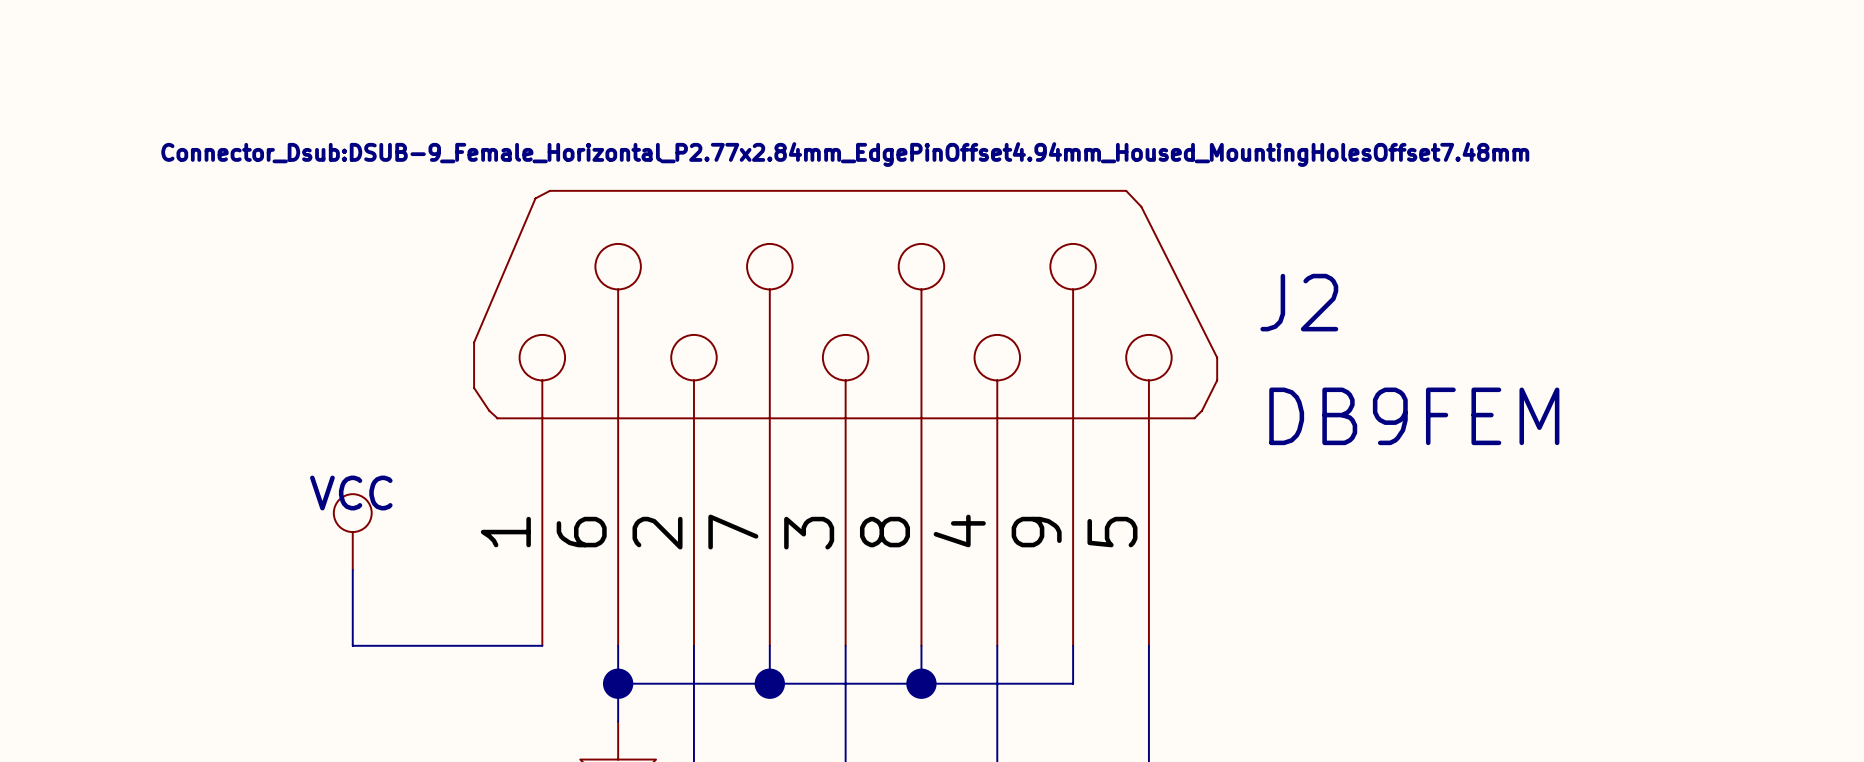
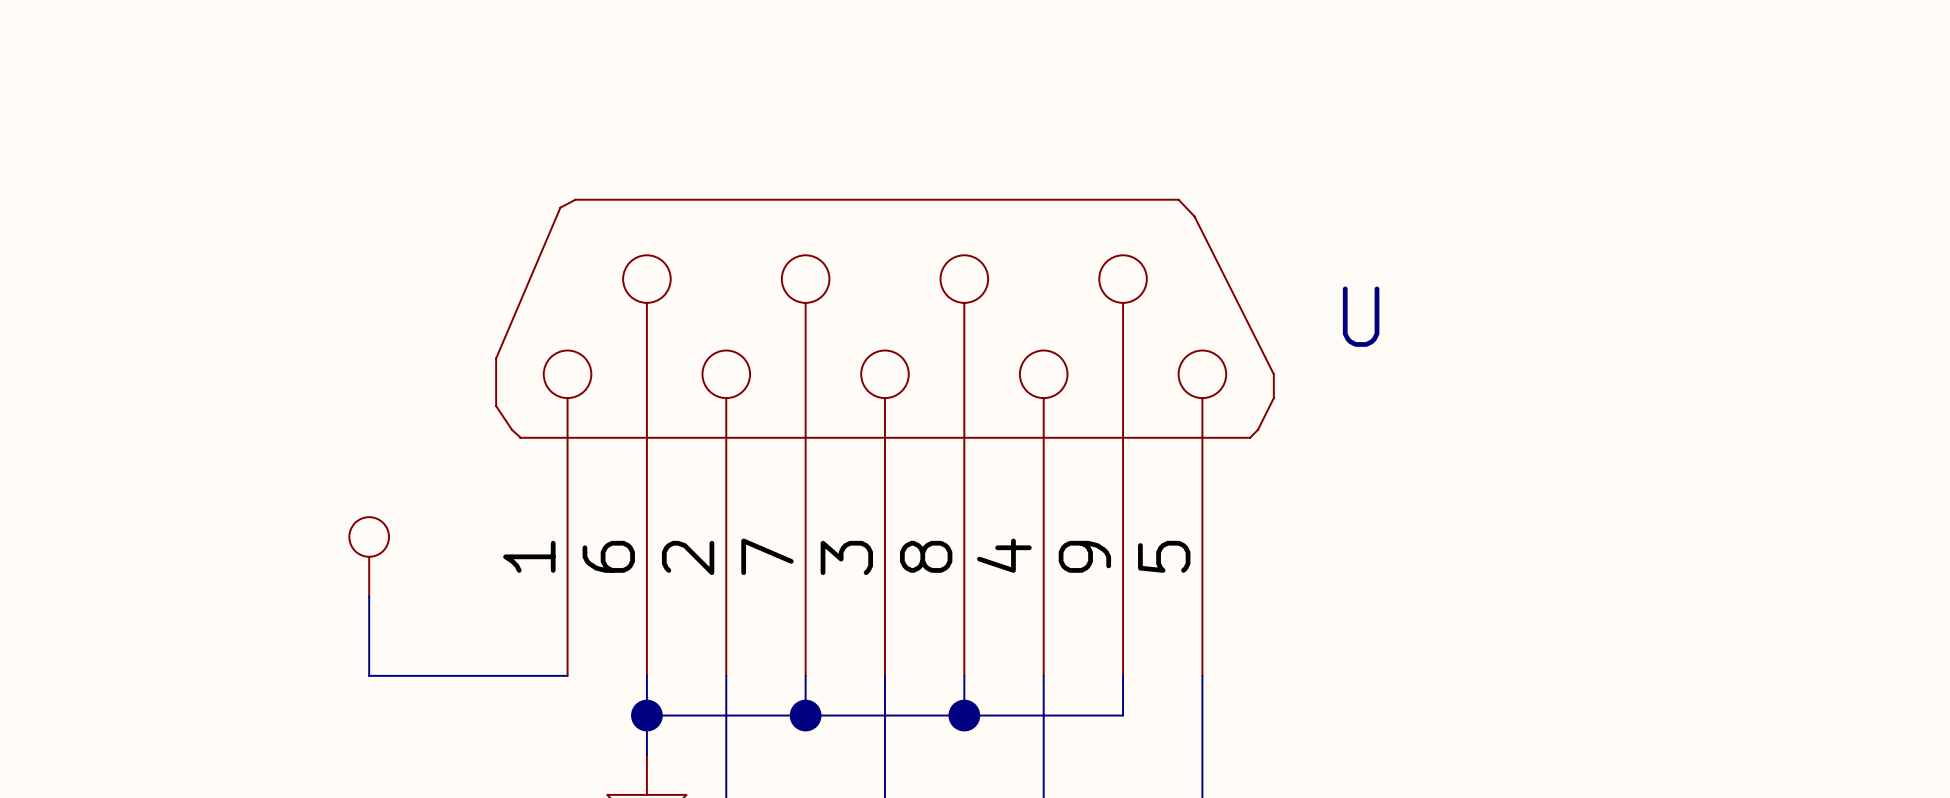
J2 text: Connector_Dsub:DSUB-9_Female_Horizontal_P2.77x2.84mm_EdgePinOffset4.94mm_Housed_MountingHolesOffset7.48mm (845, 154) -> none
J2 name: J2 (1299, 302) -> U (1361, 316)
J2 value: DB9FEM (1414, 416) -> none
power symbol text: VCC (351, 493) -> none

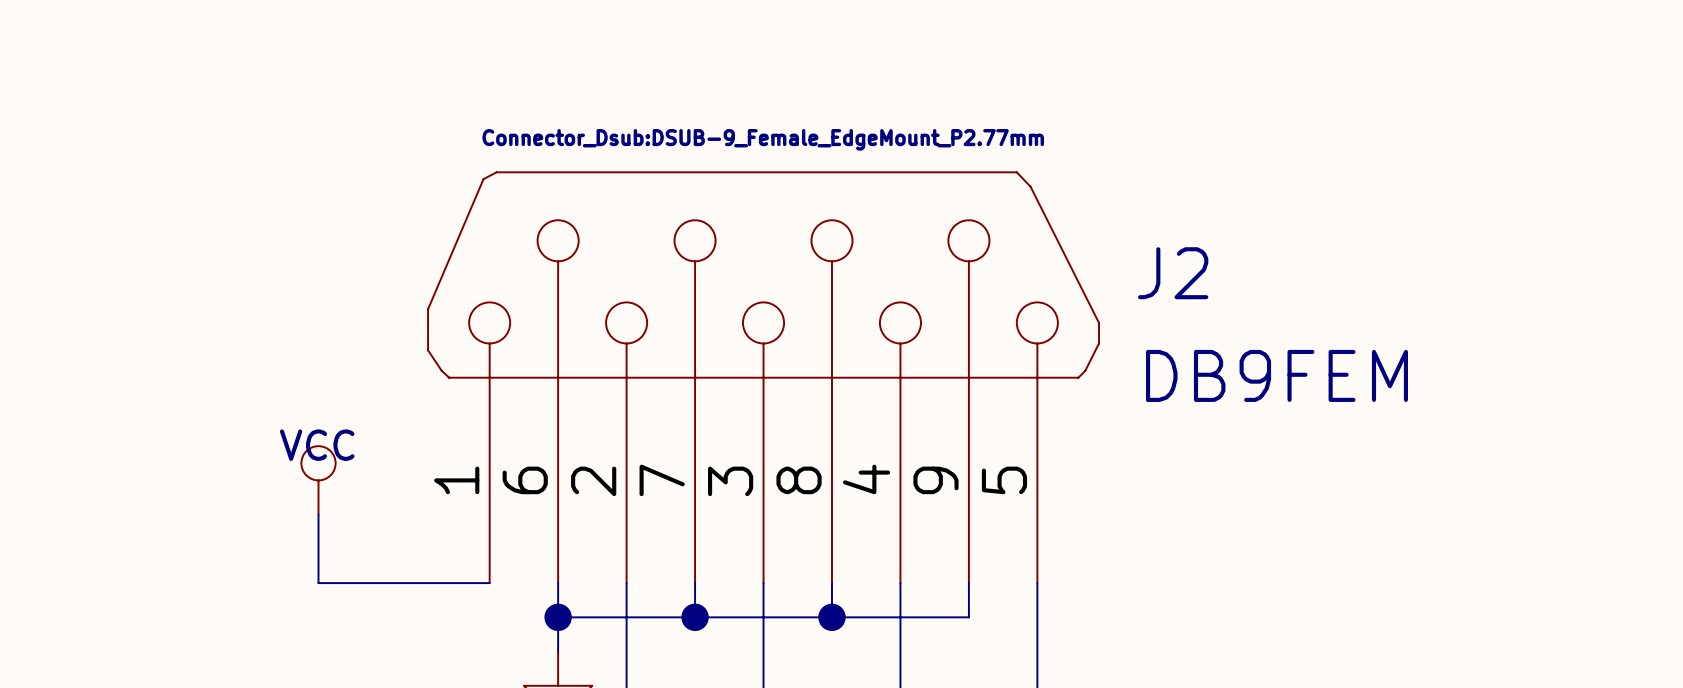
U text: none -> Connector_Dsub:DSUB-9_Female_EdgeMount_P2.77mm (763, 139)
U name: U (1361, 316) -> J2 (1173, 273)
U value: none -> DB9FEM (1277, 375)
power symbol text: none -> VCC (317, 445)

